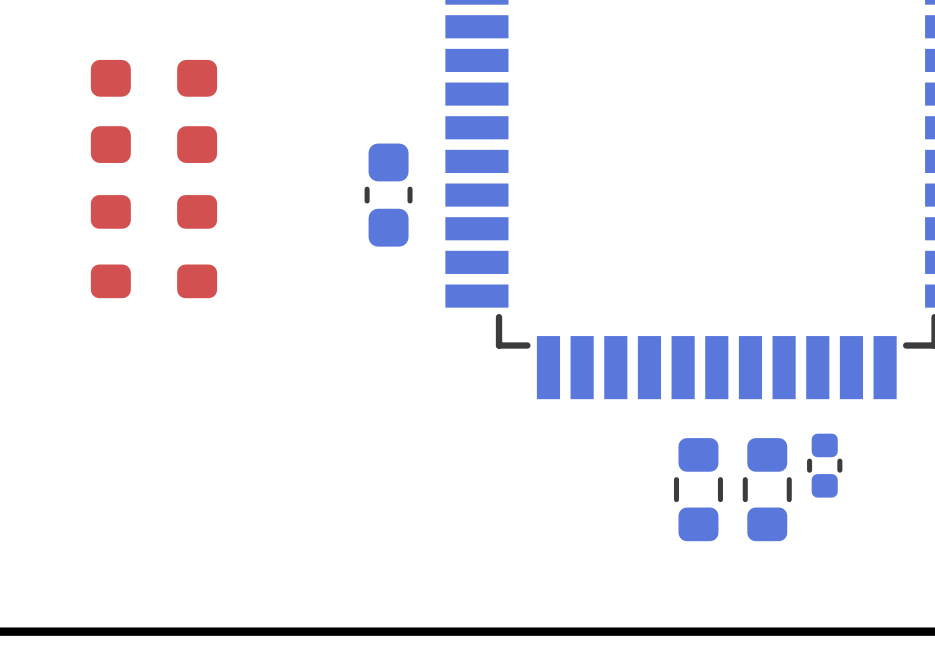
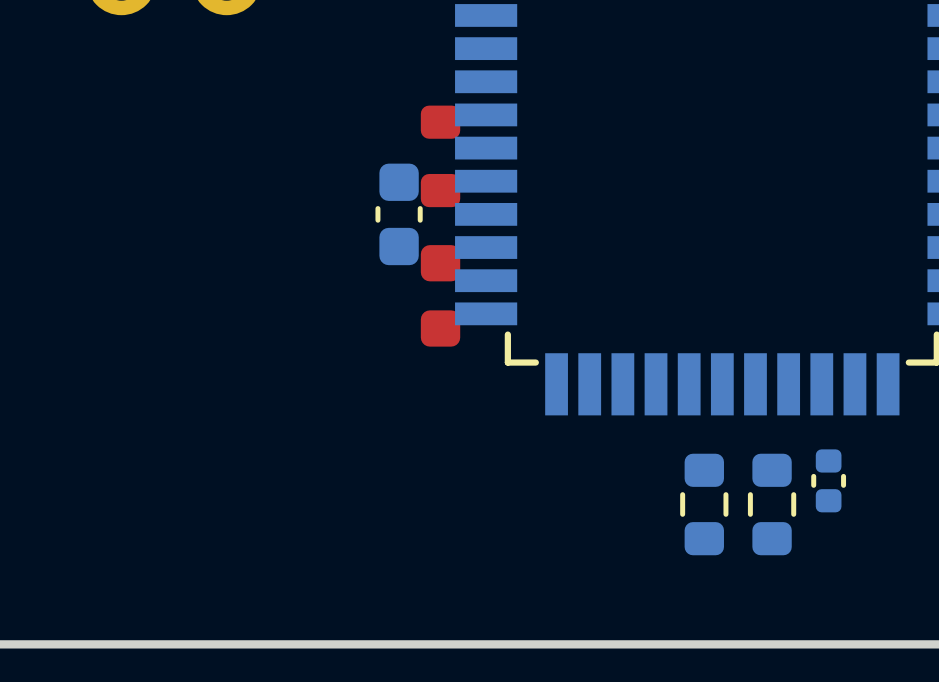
part: (110, 111) -> none
part: (197, 111) -> none
part: none -> (440, 156)
part: (110, 246) -> none
part: (197, 246) -> none
part: none -> (440, 295)

